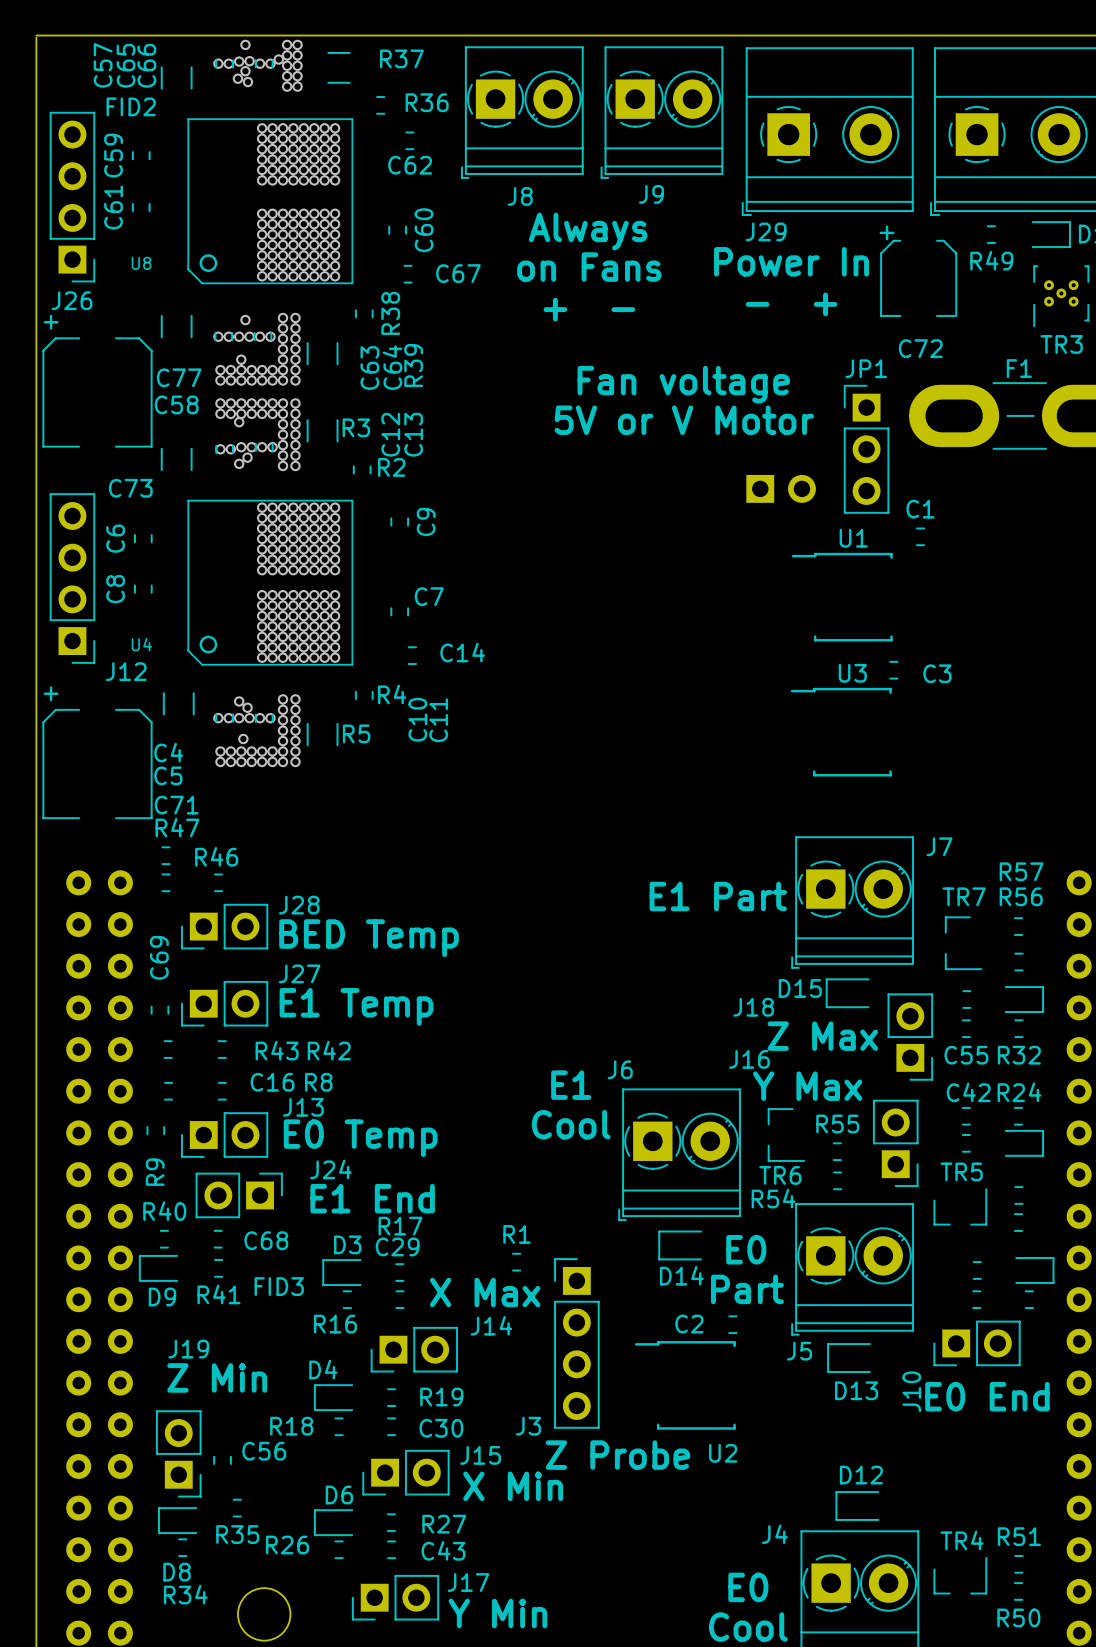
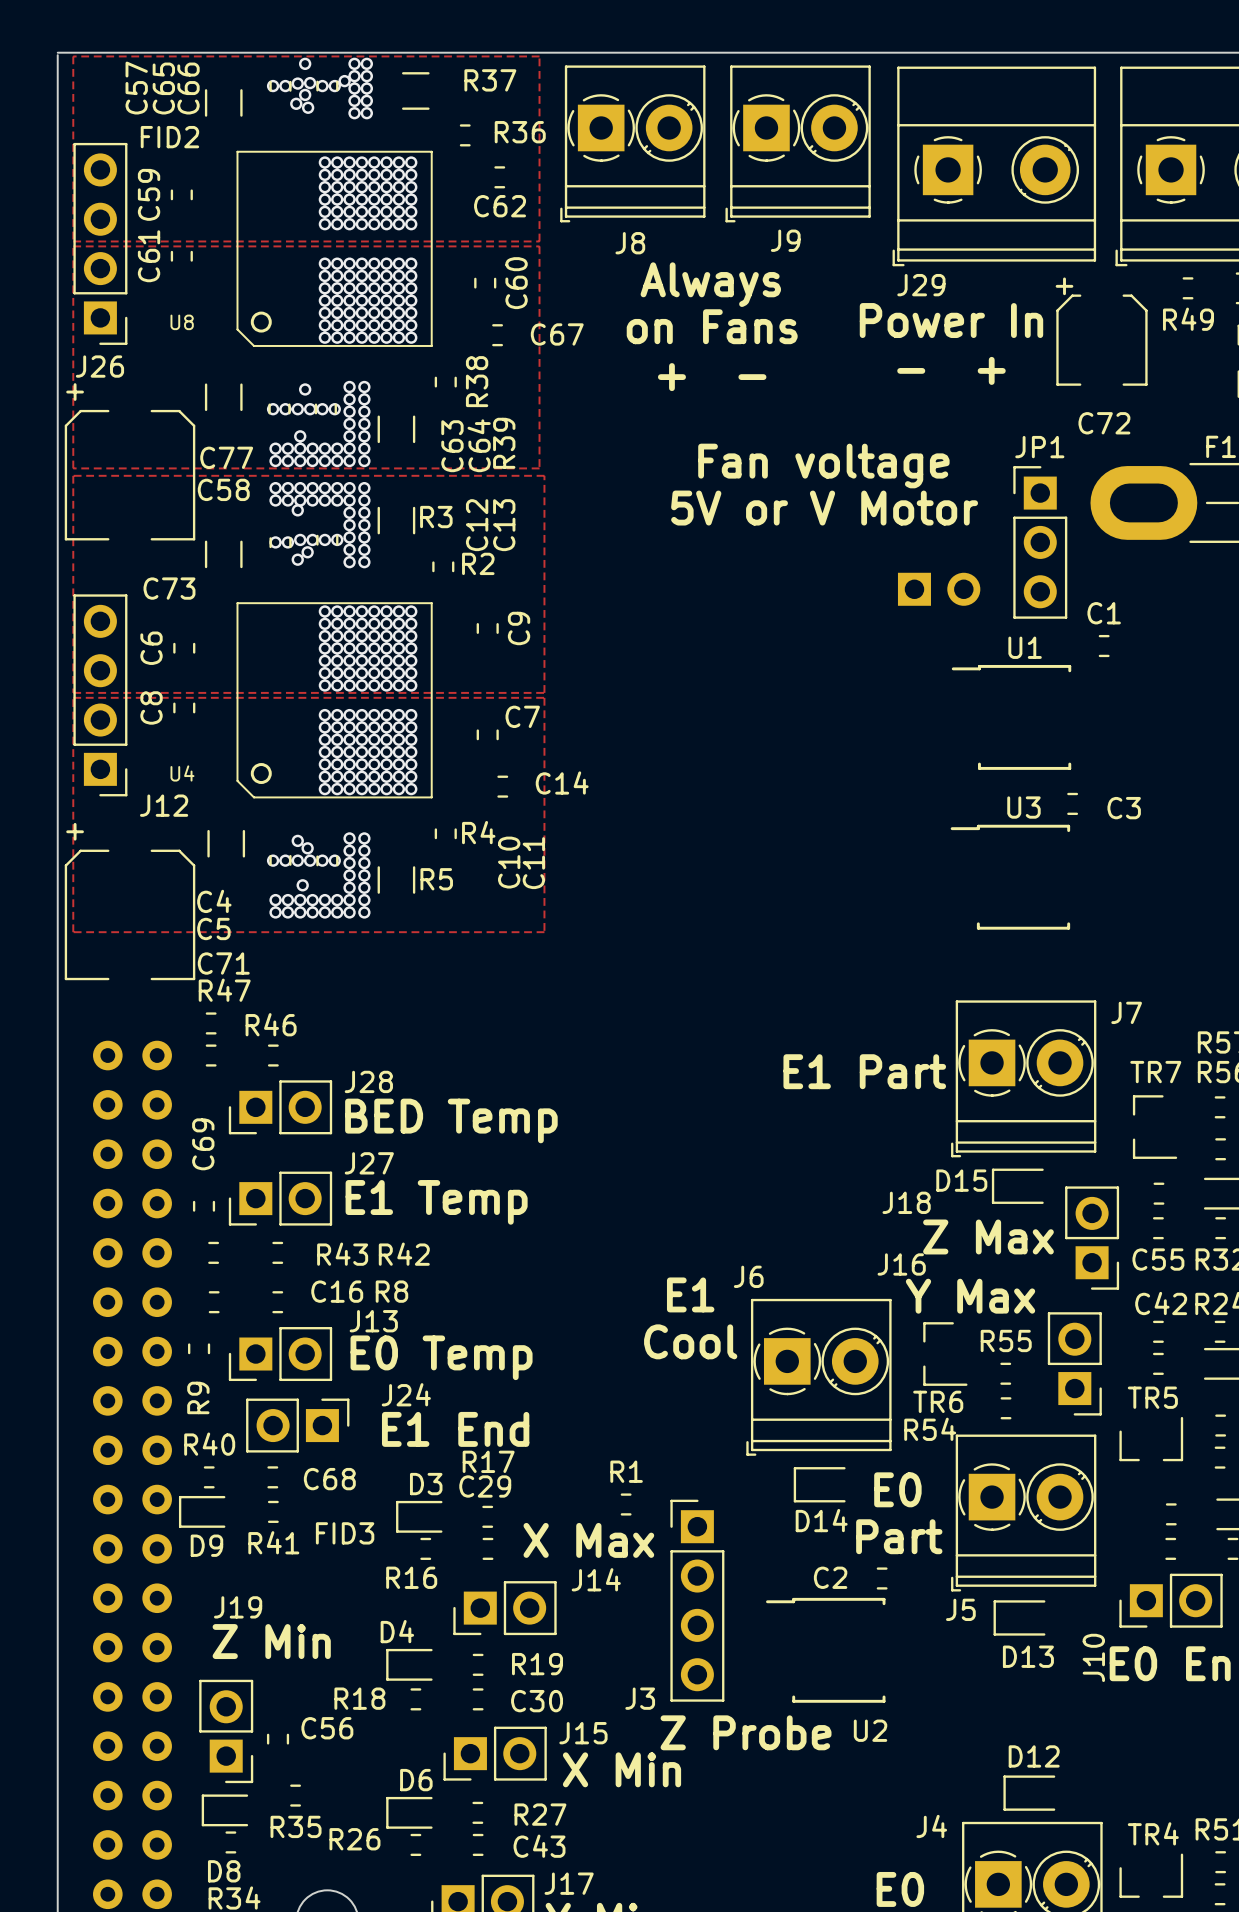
zone outline: none -> (73, 56) (539, 56) (539, 241) (73, 241) (73, 56)
zone outline: none -> (73, 246) (73, 468) (539, 468) (539, 246) (73, 246)
zone outline: none -> (73, 475) (73, 692) (544, 692) (544, 475) (73, 475)
zone outline: none -> (73, 697) (73, 932) (544, 932) (544, 697) (73, 697)

